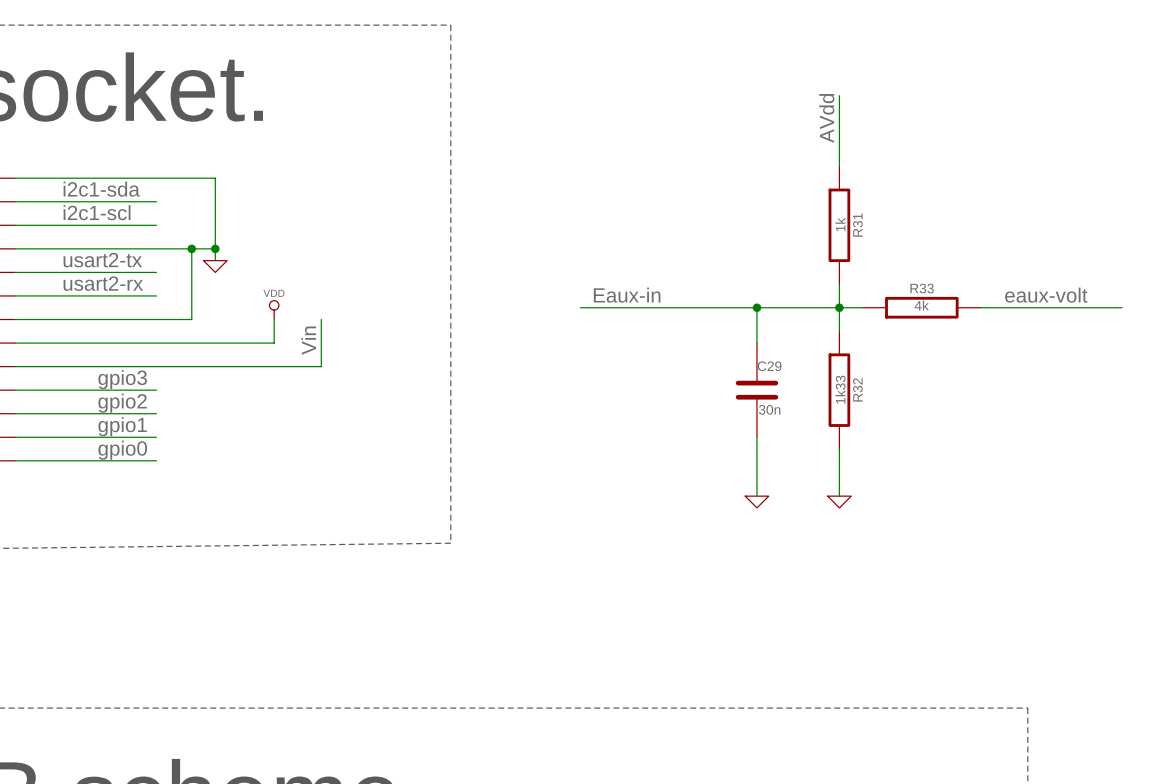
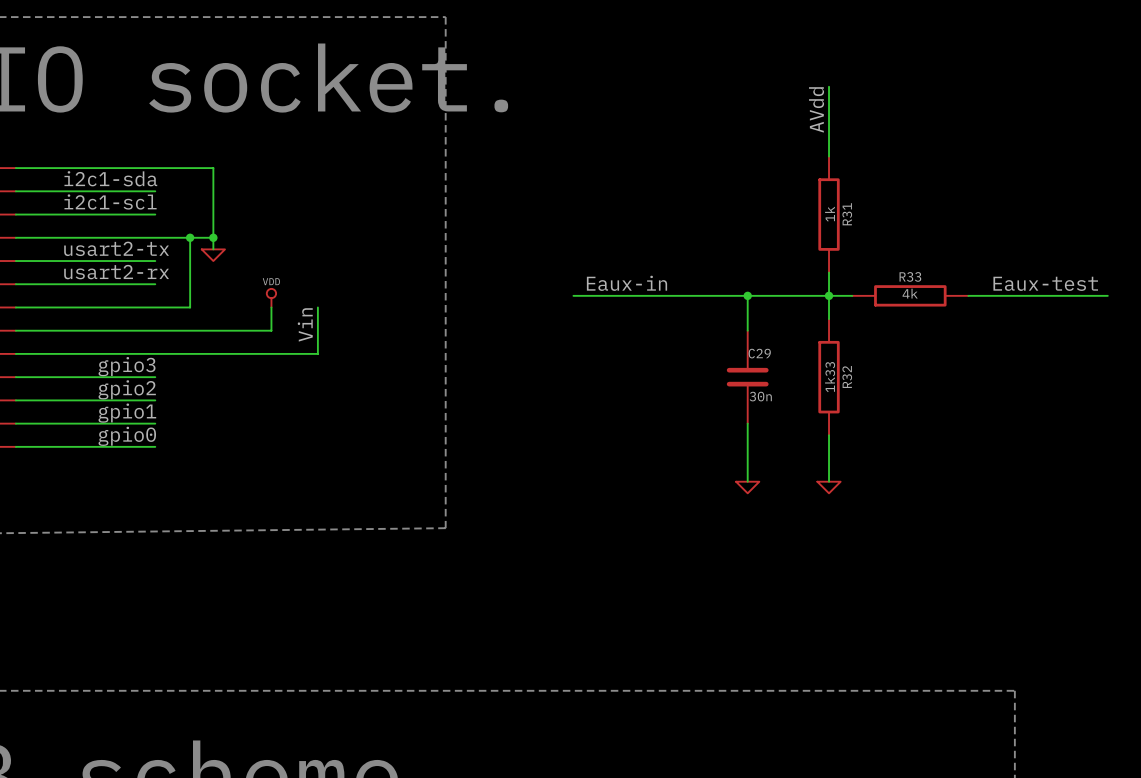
label: eaux-volt (1046, 295) -> Eaux-test (1045, 283)

